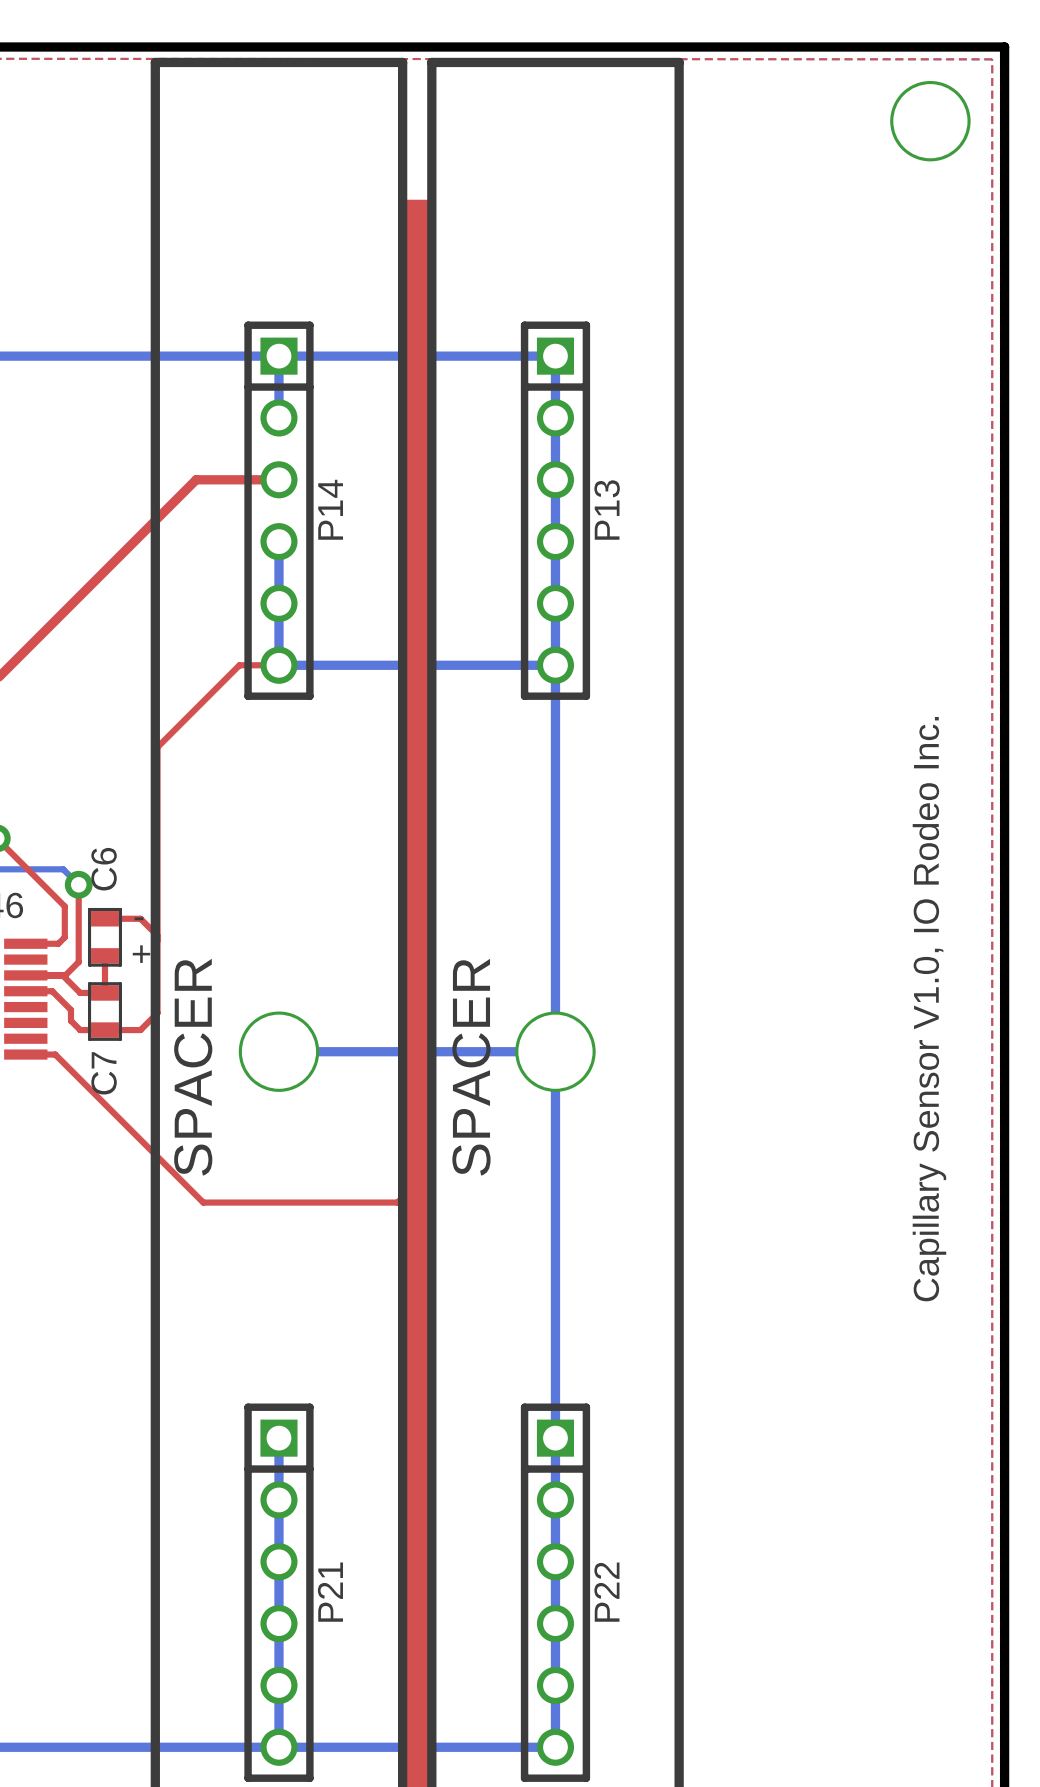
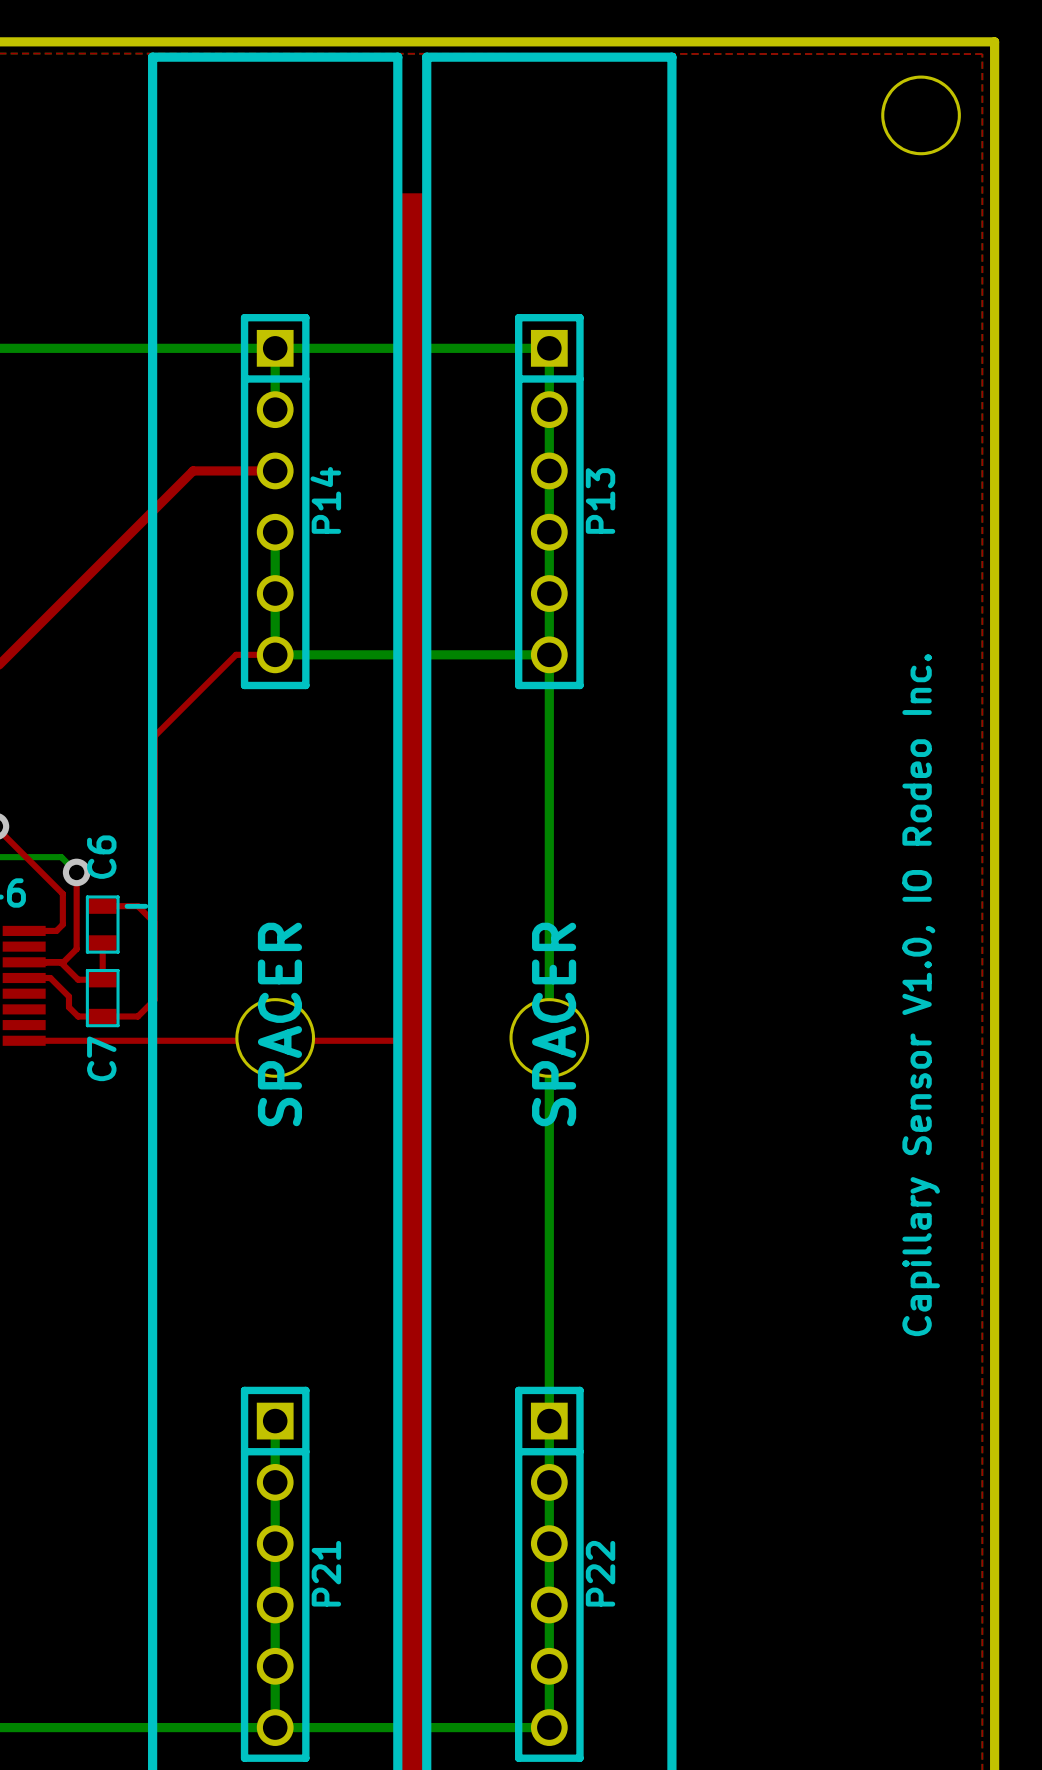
text: + (141, 954) -> none
bottom track: (278, 1051) (555, 1051) -> none
top track: (417, 1051) (417, 1182) (397, 1202) (203, 1202) (55, 1054) -> (412, 1037) (409, 1040) (53, 1040)
SPACER name position: SPACER (193, 1067) -> SPACER (279, 1024)
SPACER name position: SPACER (471, 1067) -> SPACER (554, 1024)

